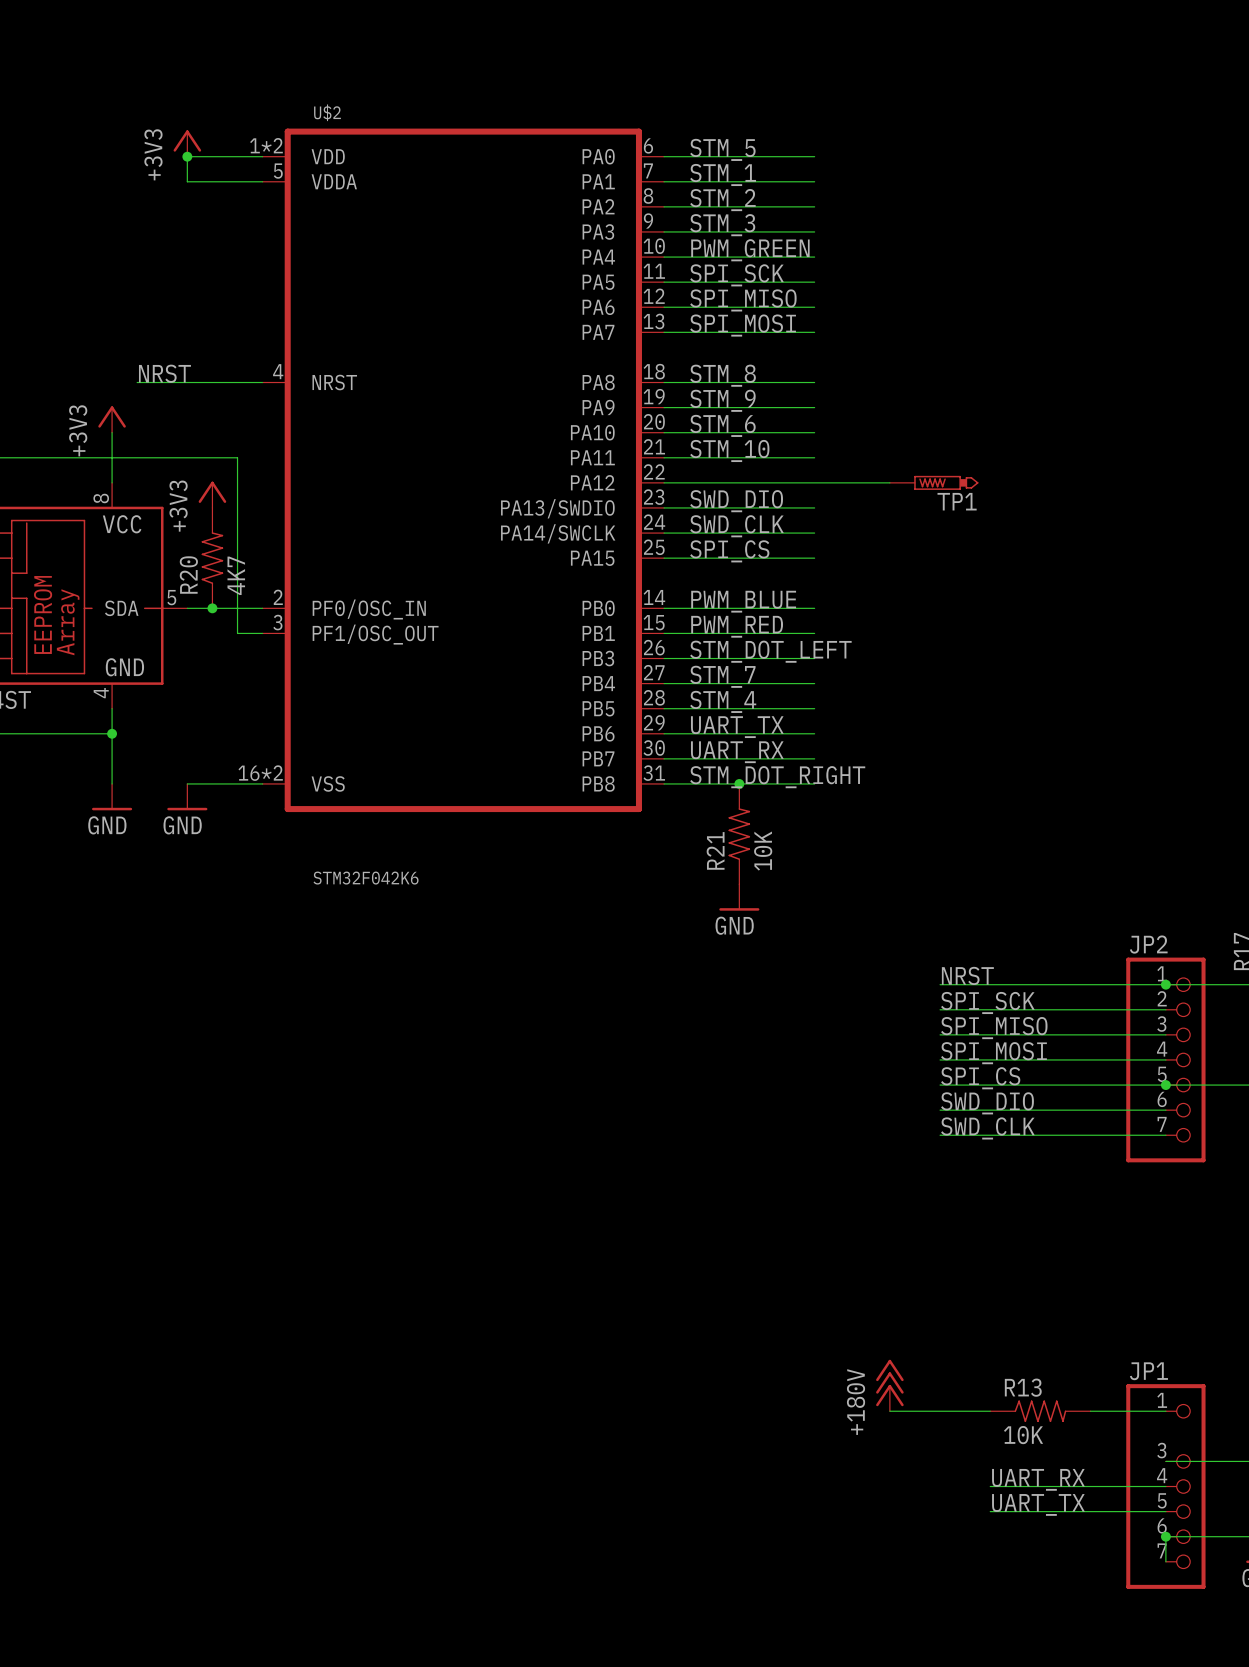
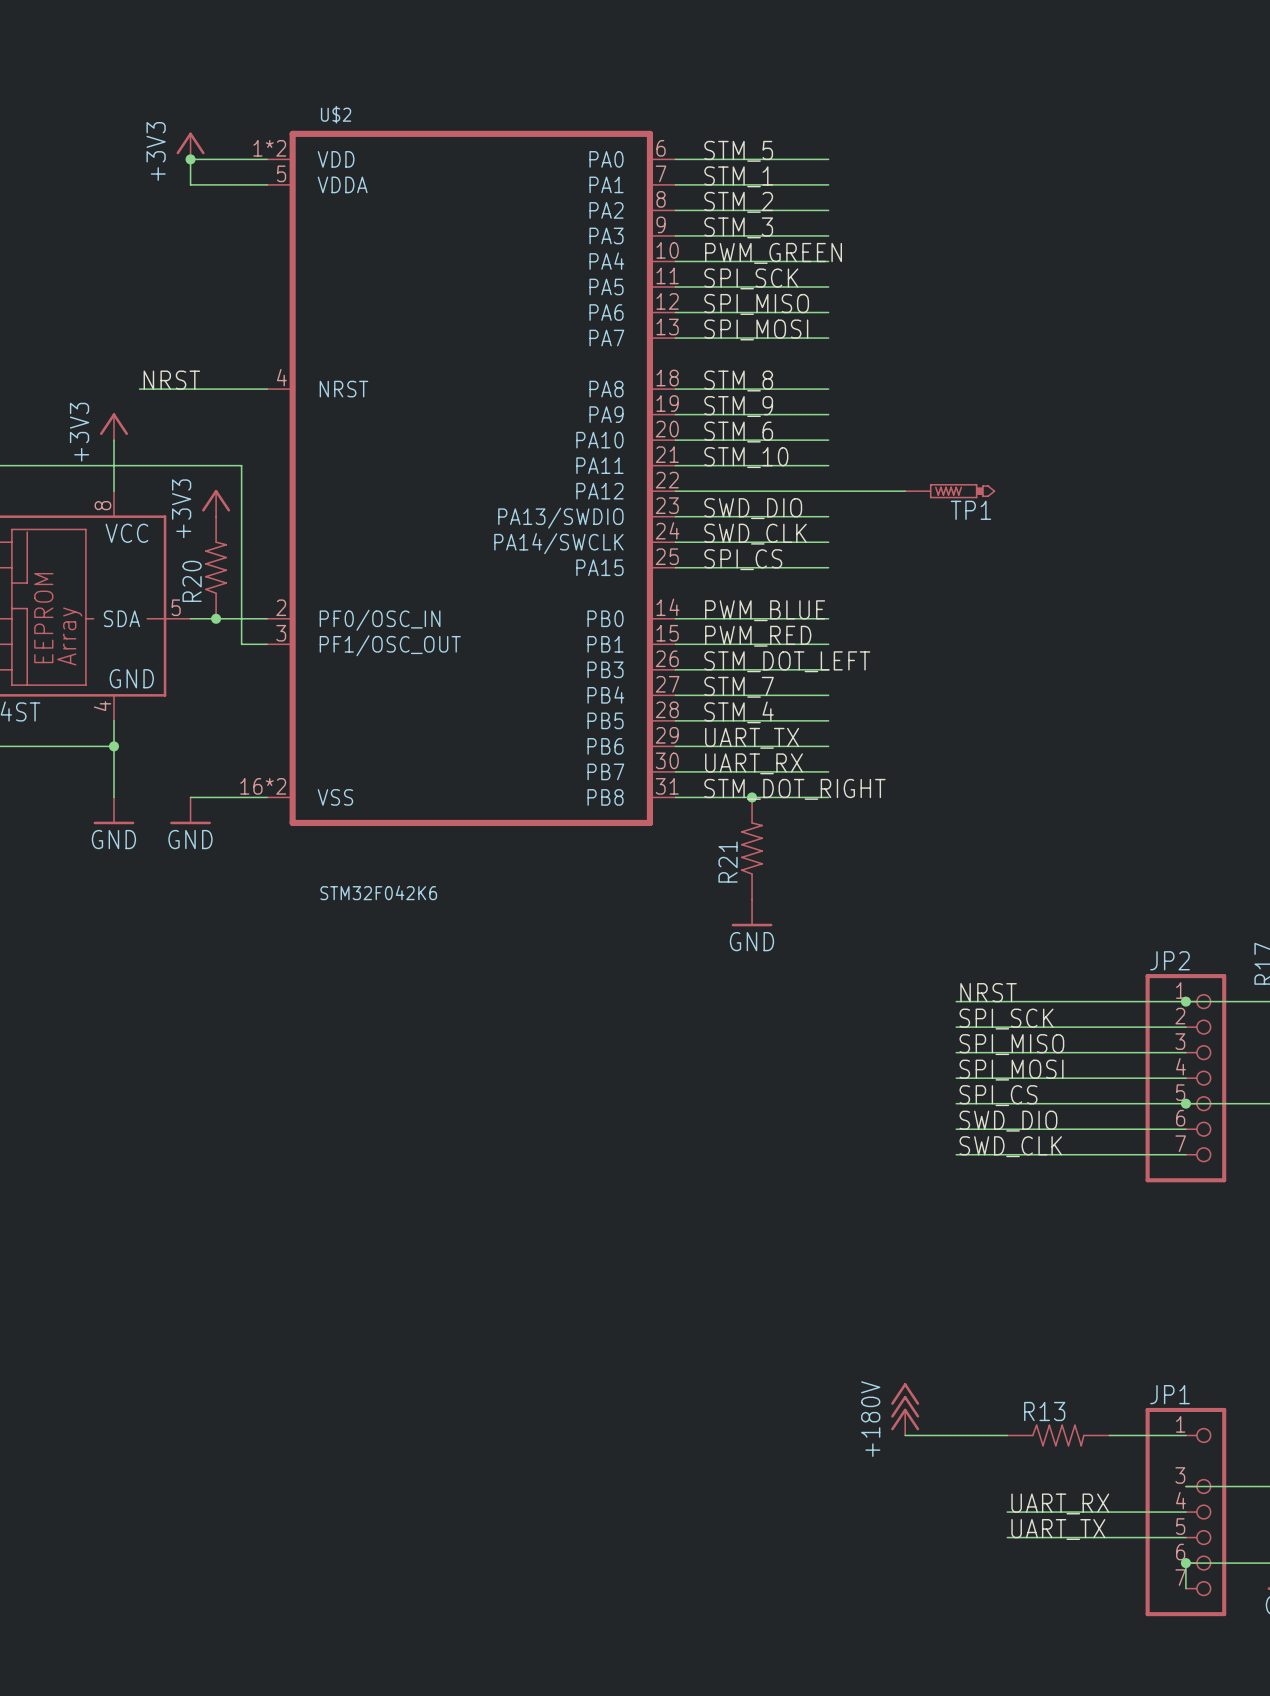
R20 value: 4K7 (236, 575) -> none
R21 value: 10K (763, 851) -> none
R13 value: 10K (1023, 1435) -> none

